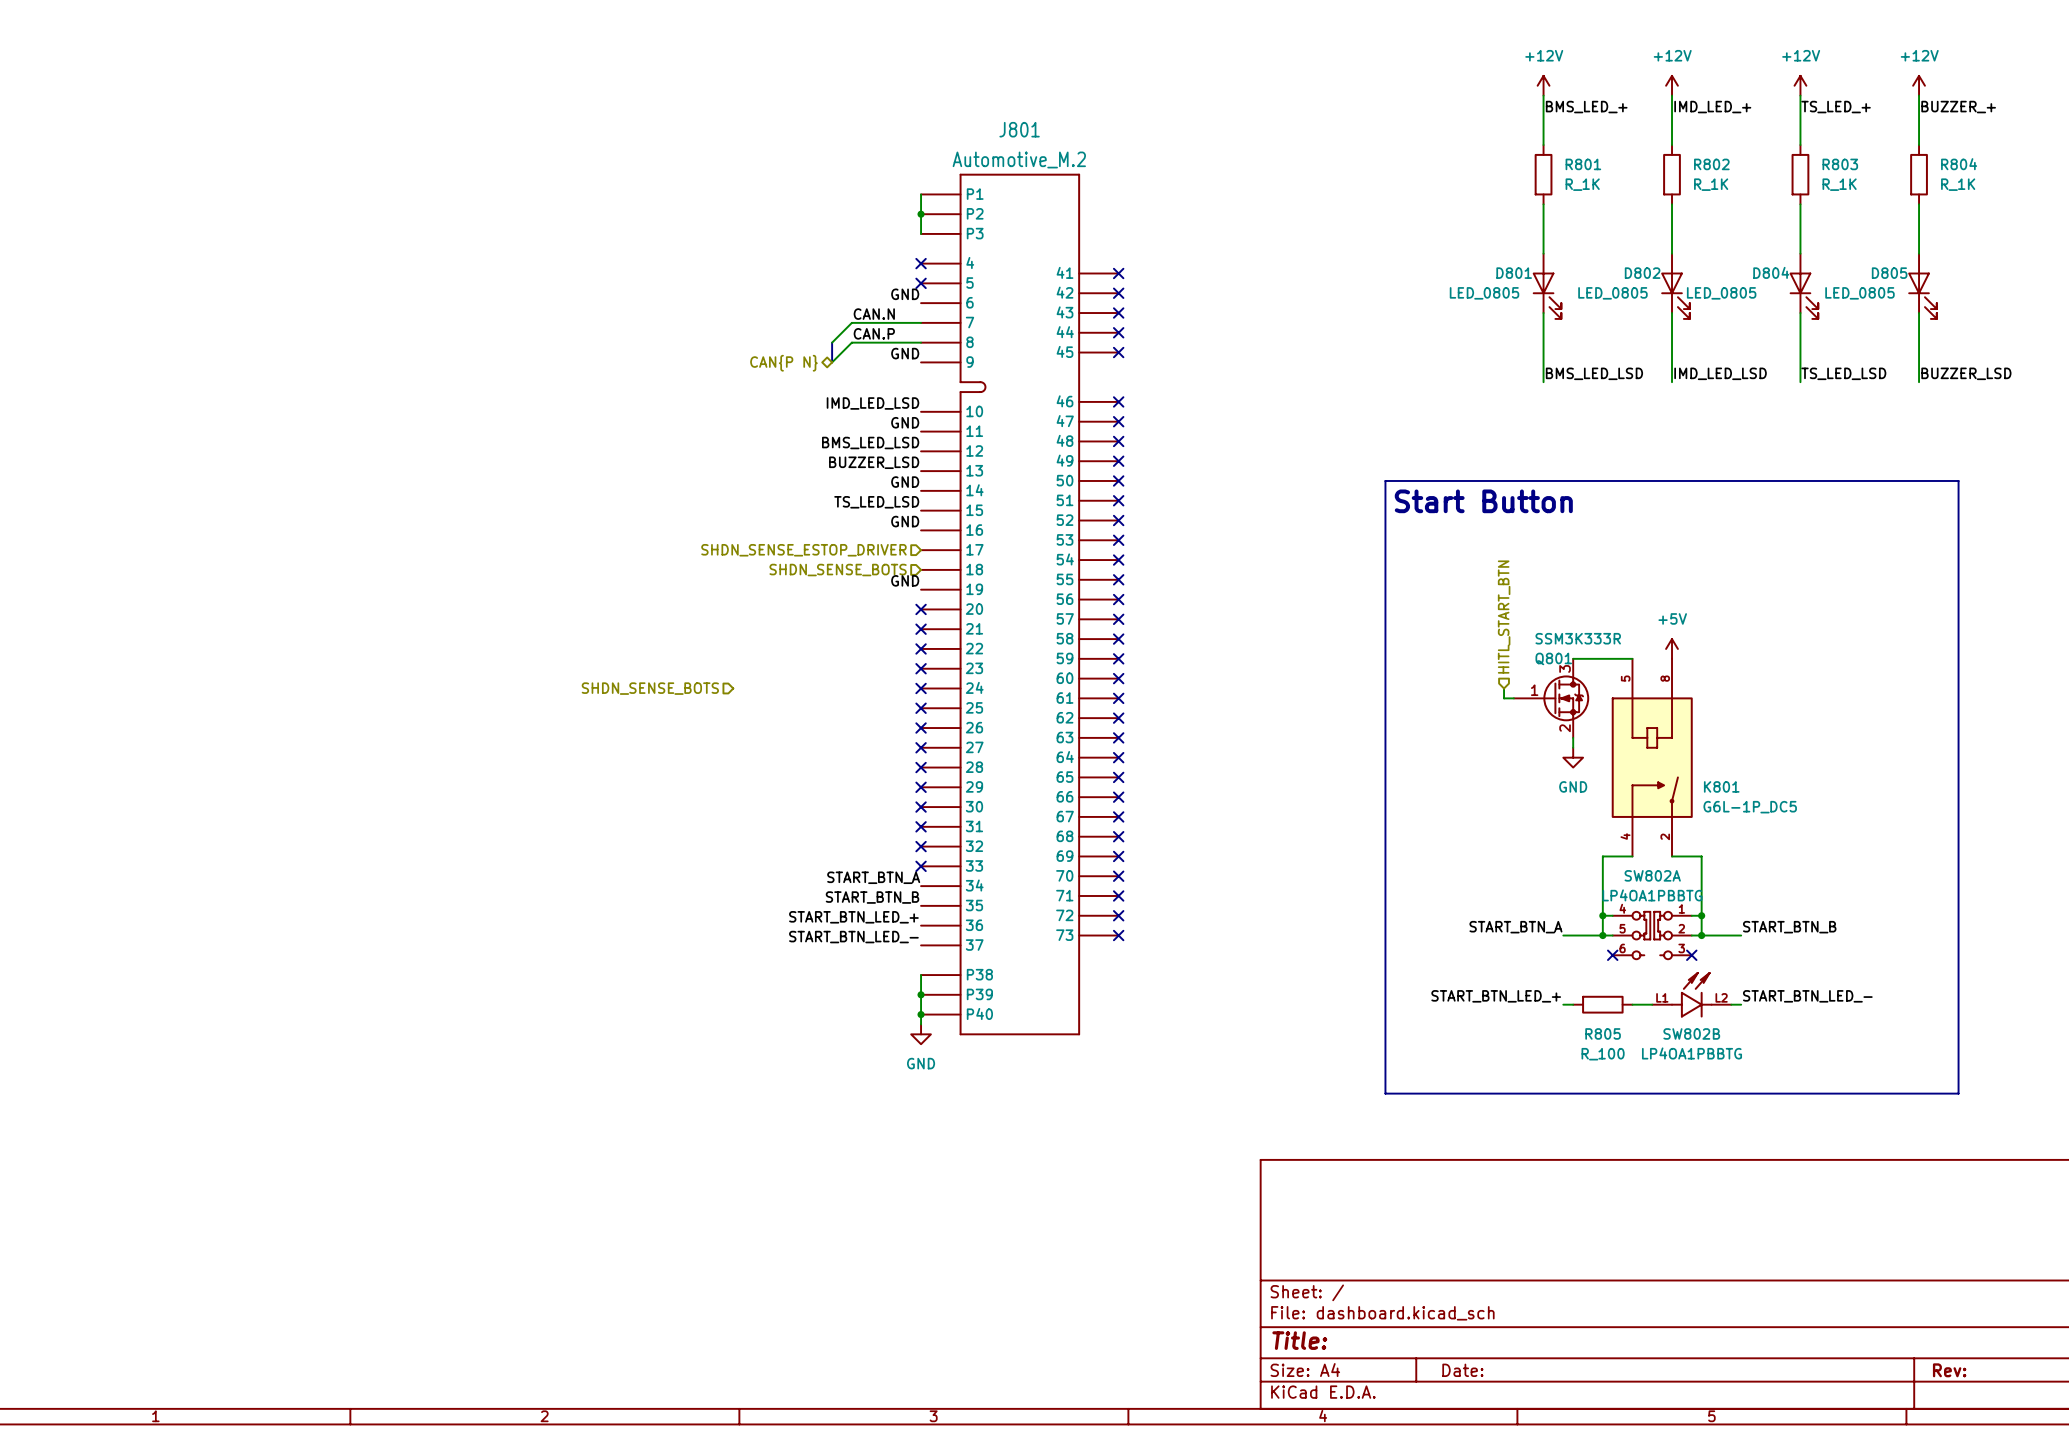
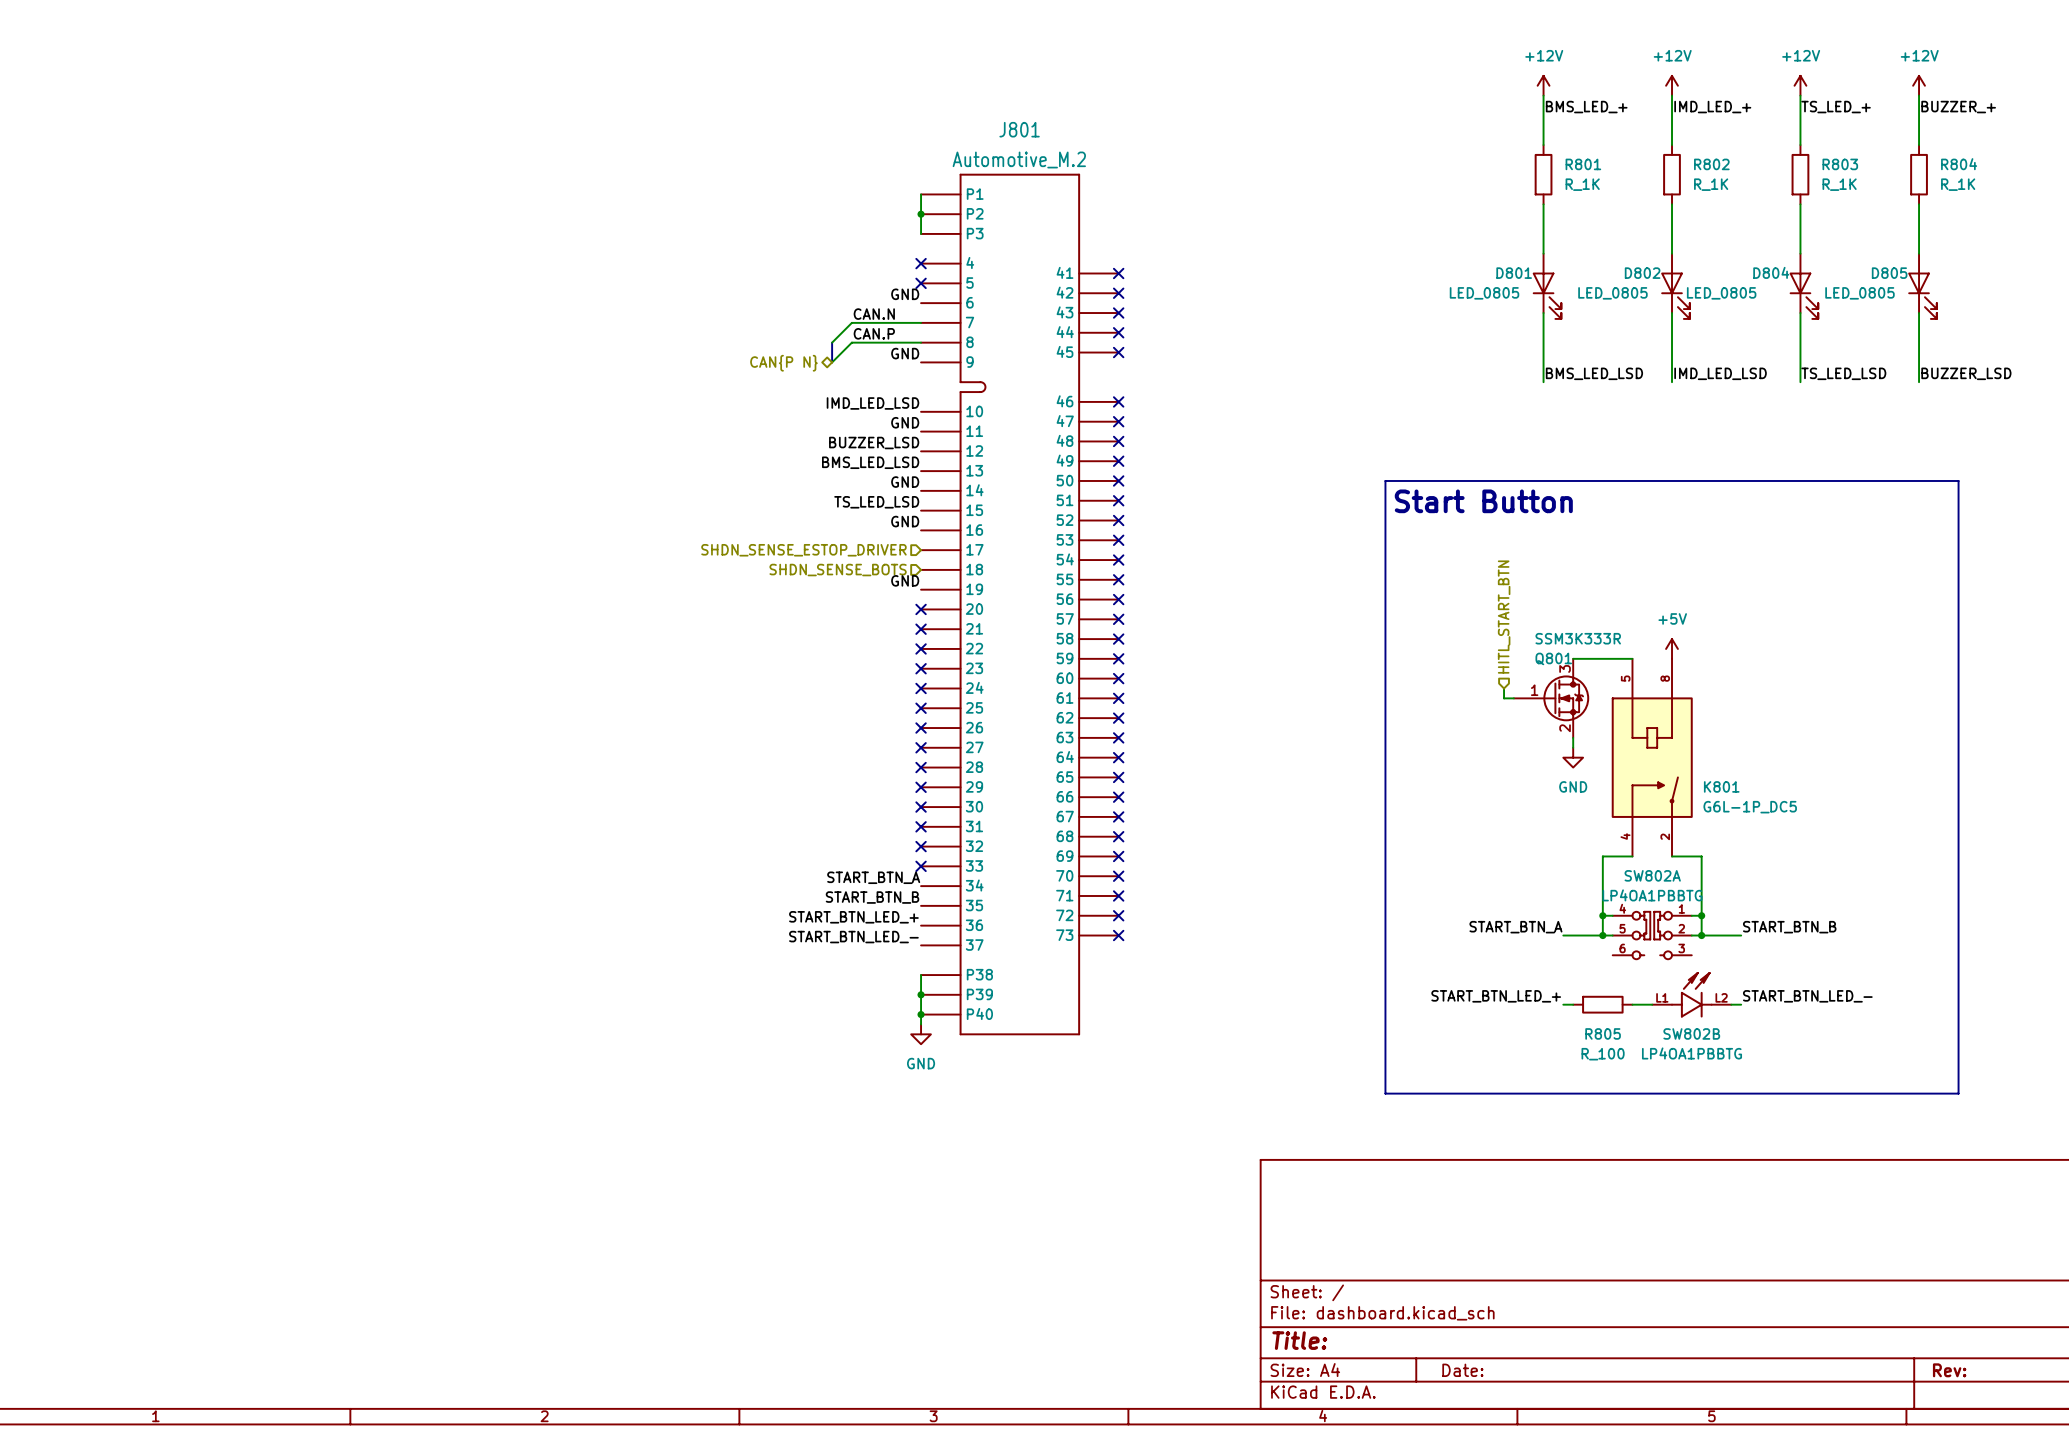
label: BMS_LED_LSD (870, 443) -> BUZZER_LSD (874, 443)
label: BUZZER_LSD (874, 462) -> BMS_LED_LSD (870, 462)
hierarchical label: SHDN_SENSE_BOTS (650, 688) -> none
no-connect mark: (1612, 955) -> none
no-connect mark: (1691, 955) -> none

